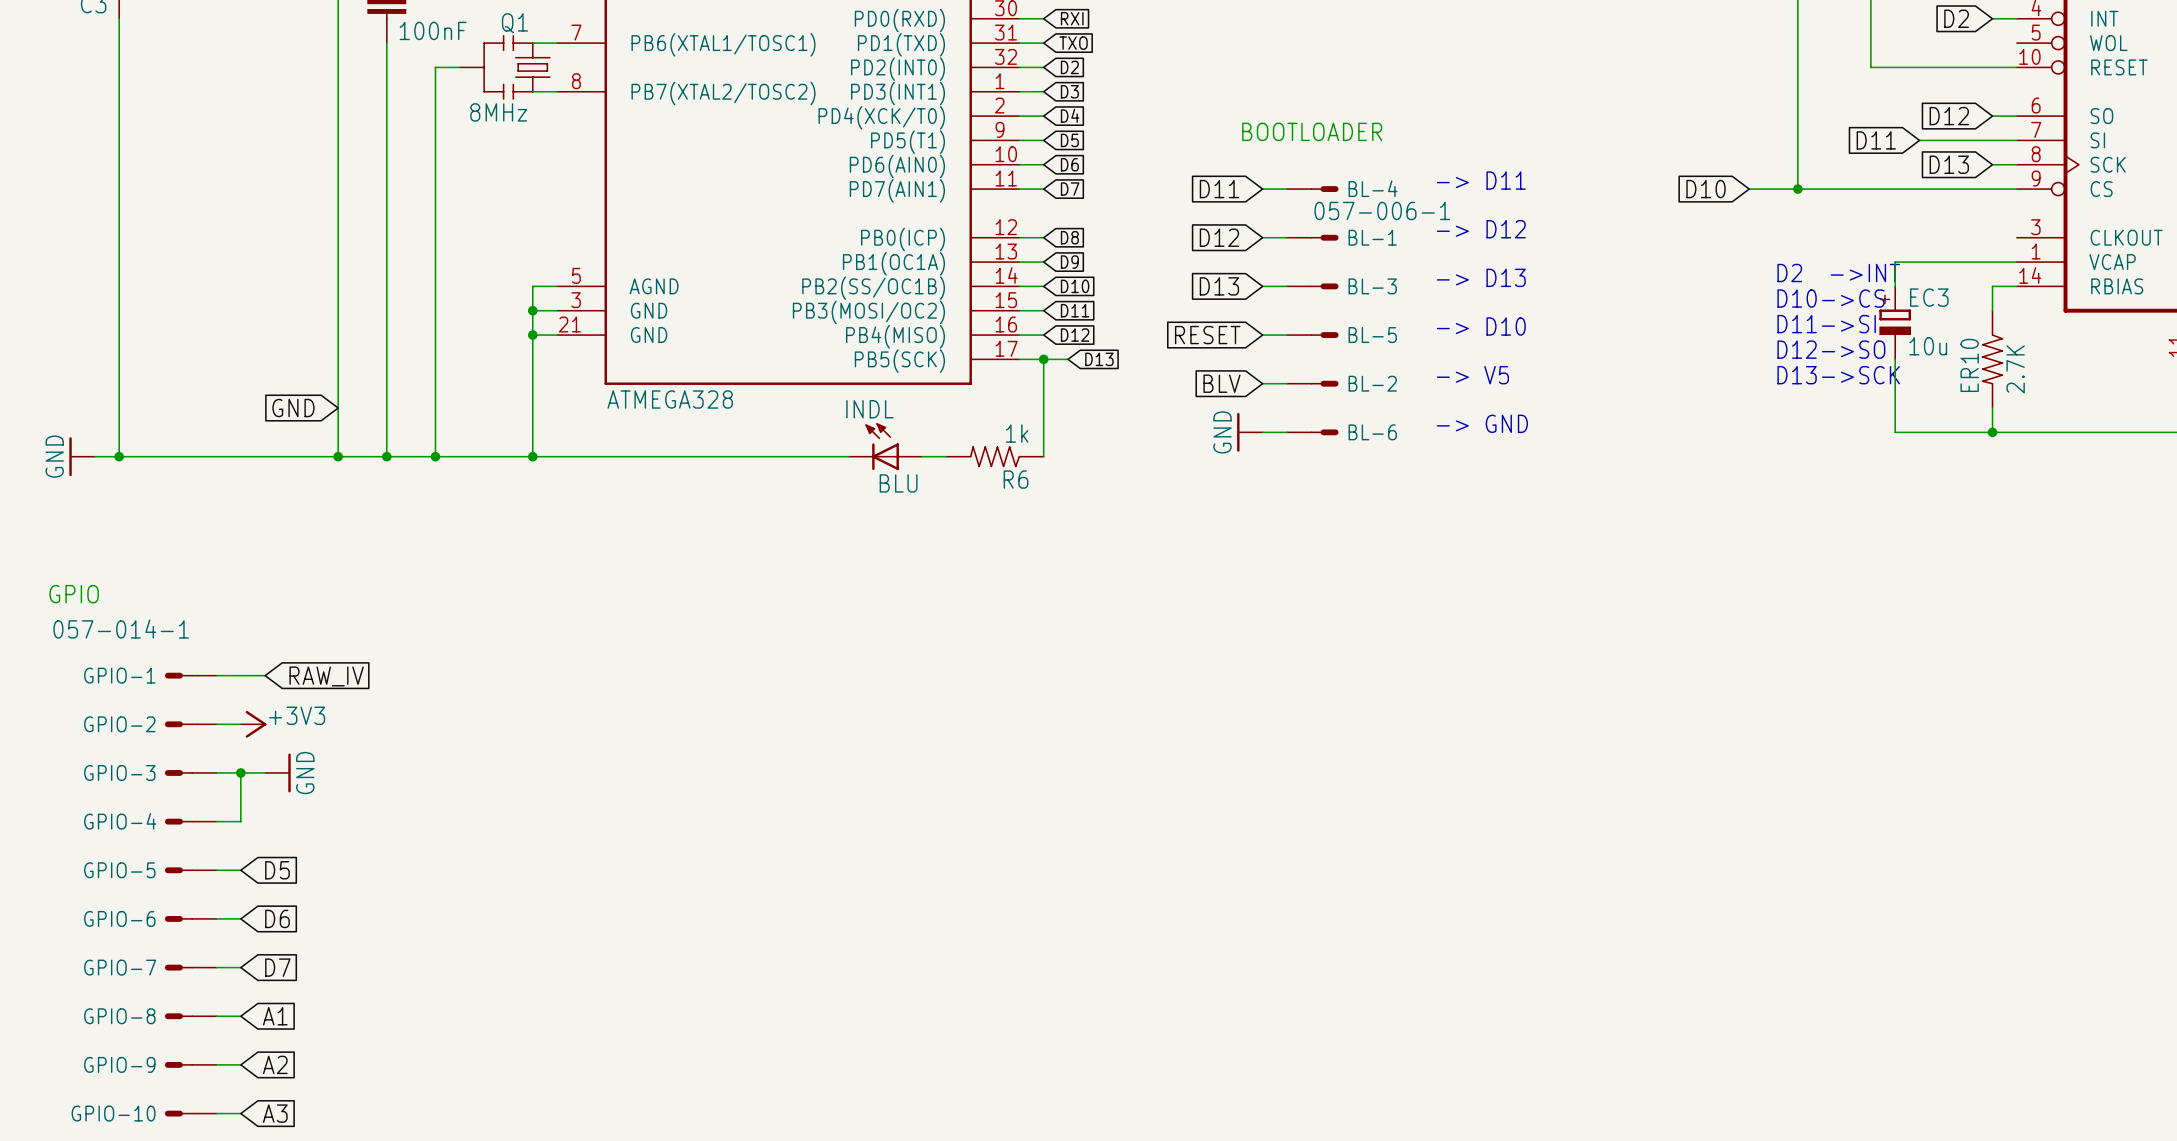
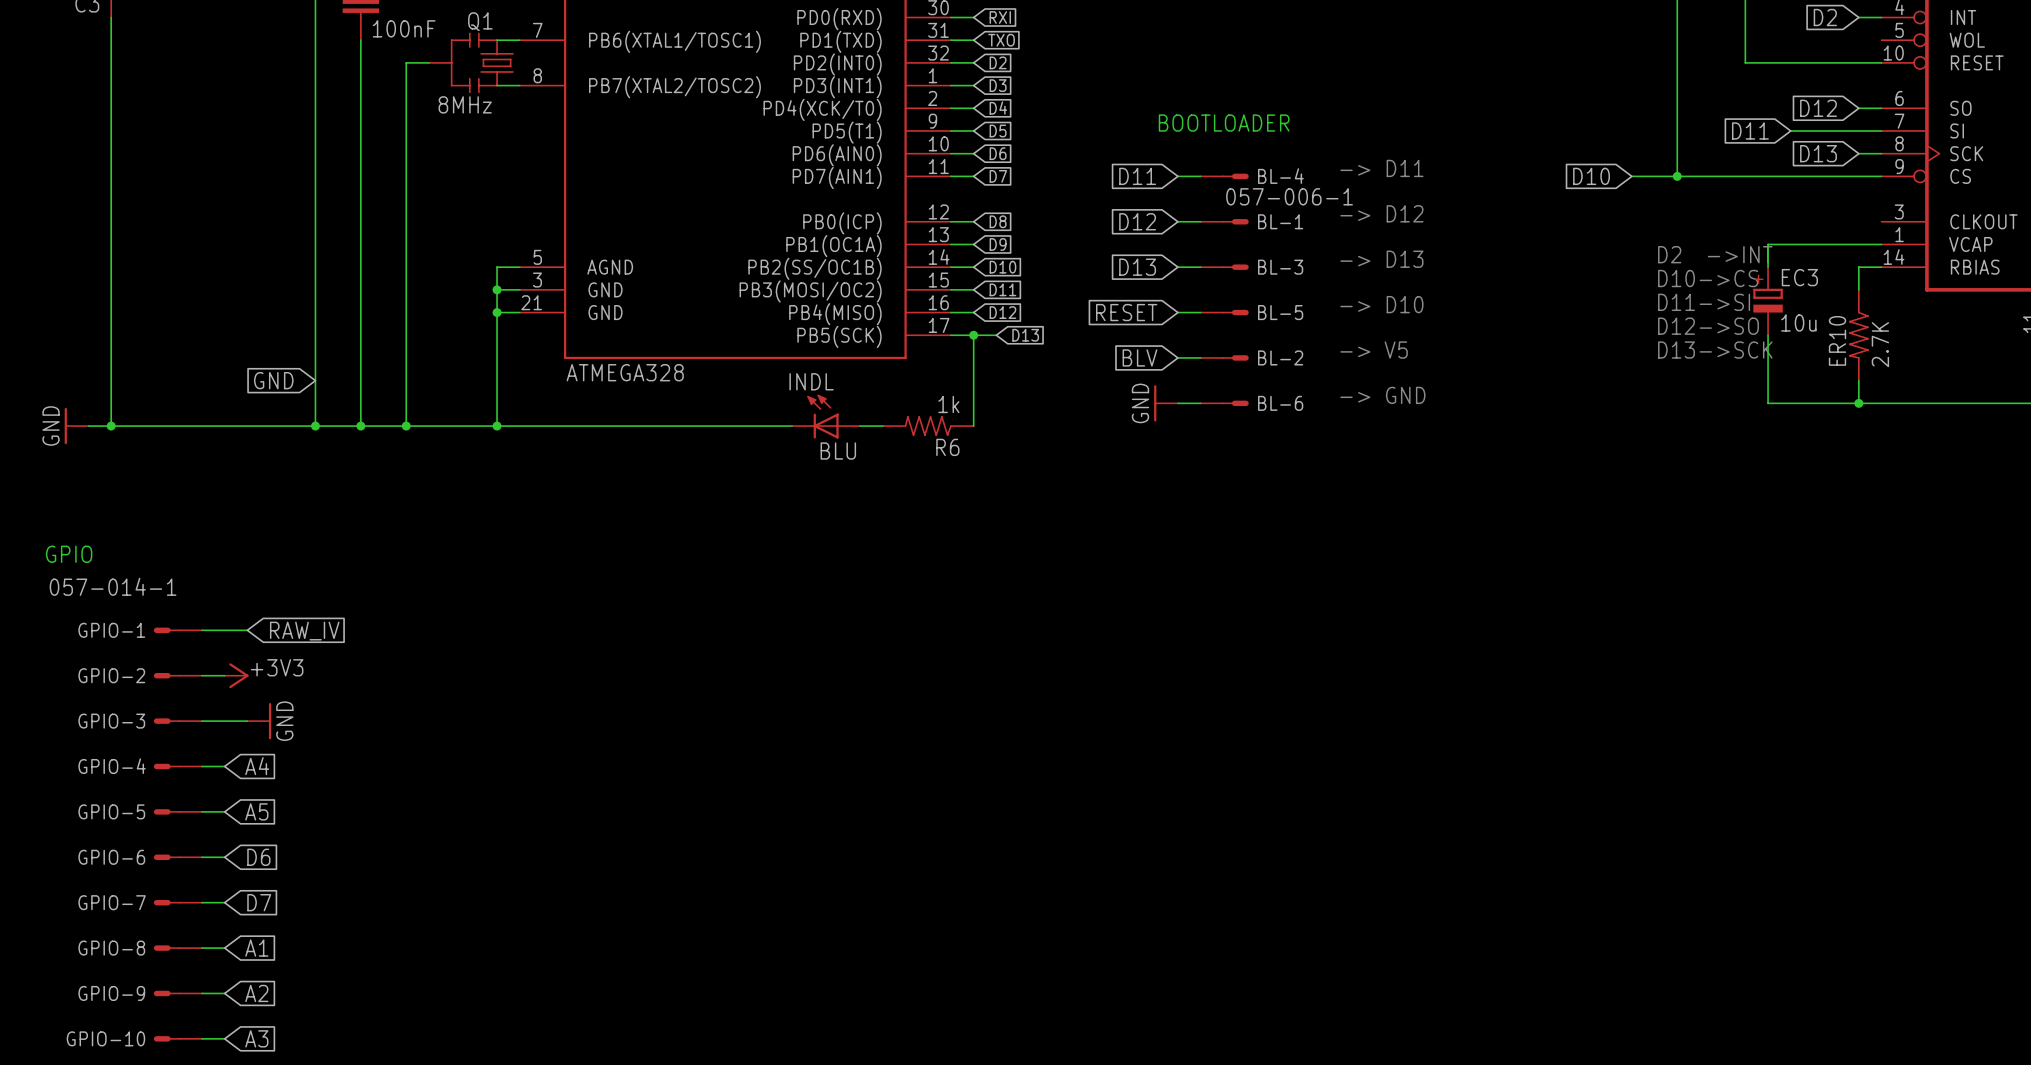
wire: (240, 772) (240, 821) -> none
junction: (240, 772) -> none
global label: none -> A4 (257, 766)
global label: D5 (277, 870) -> A5 (256, 811)

